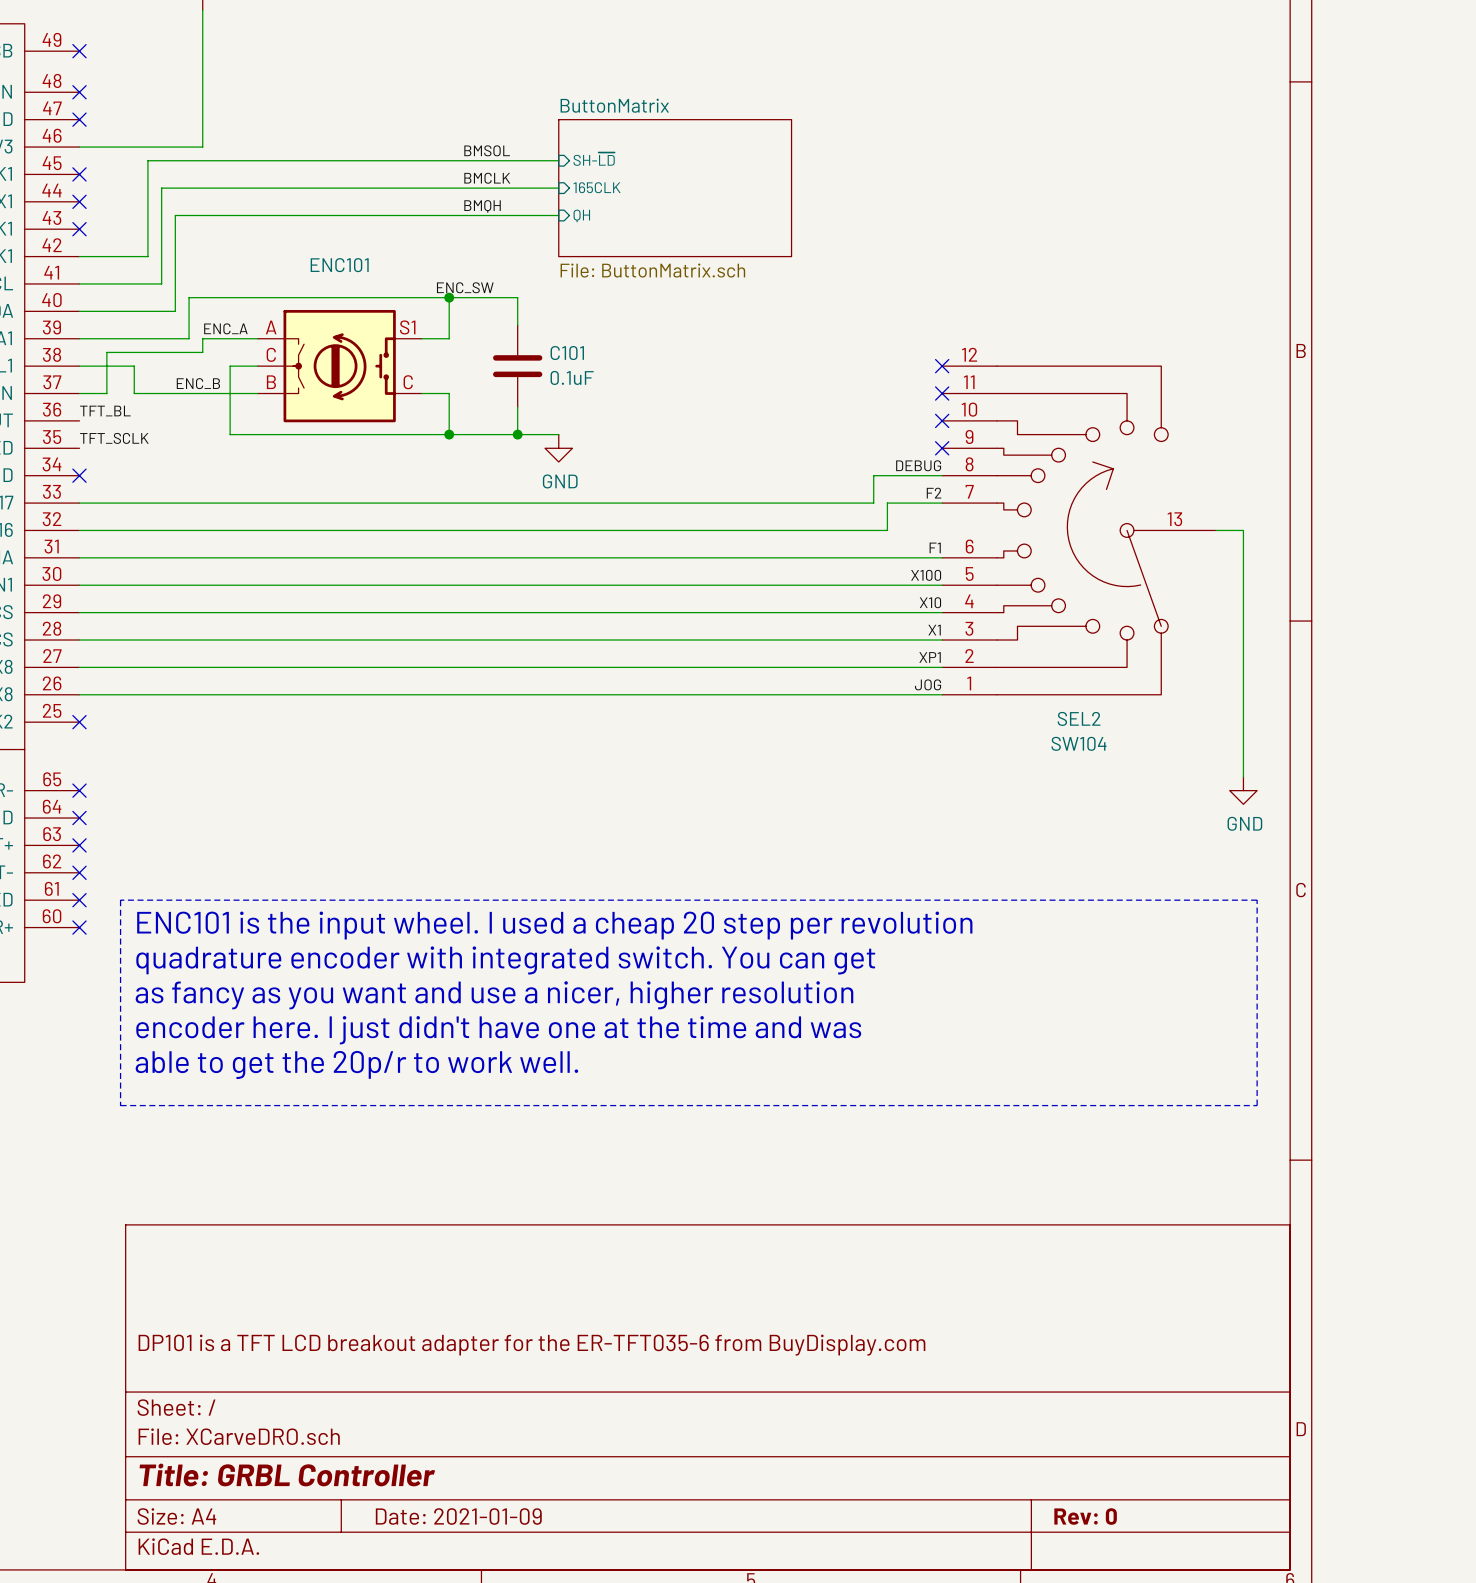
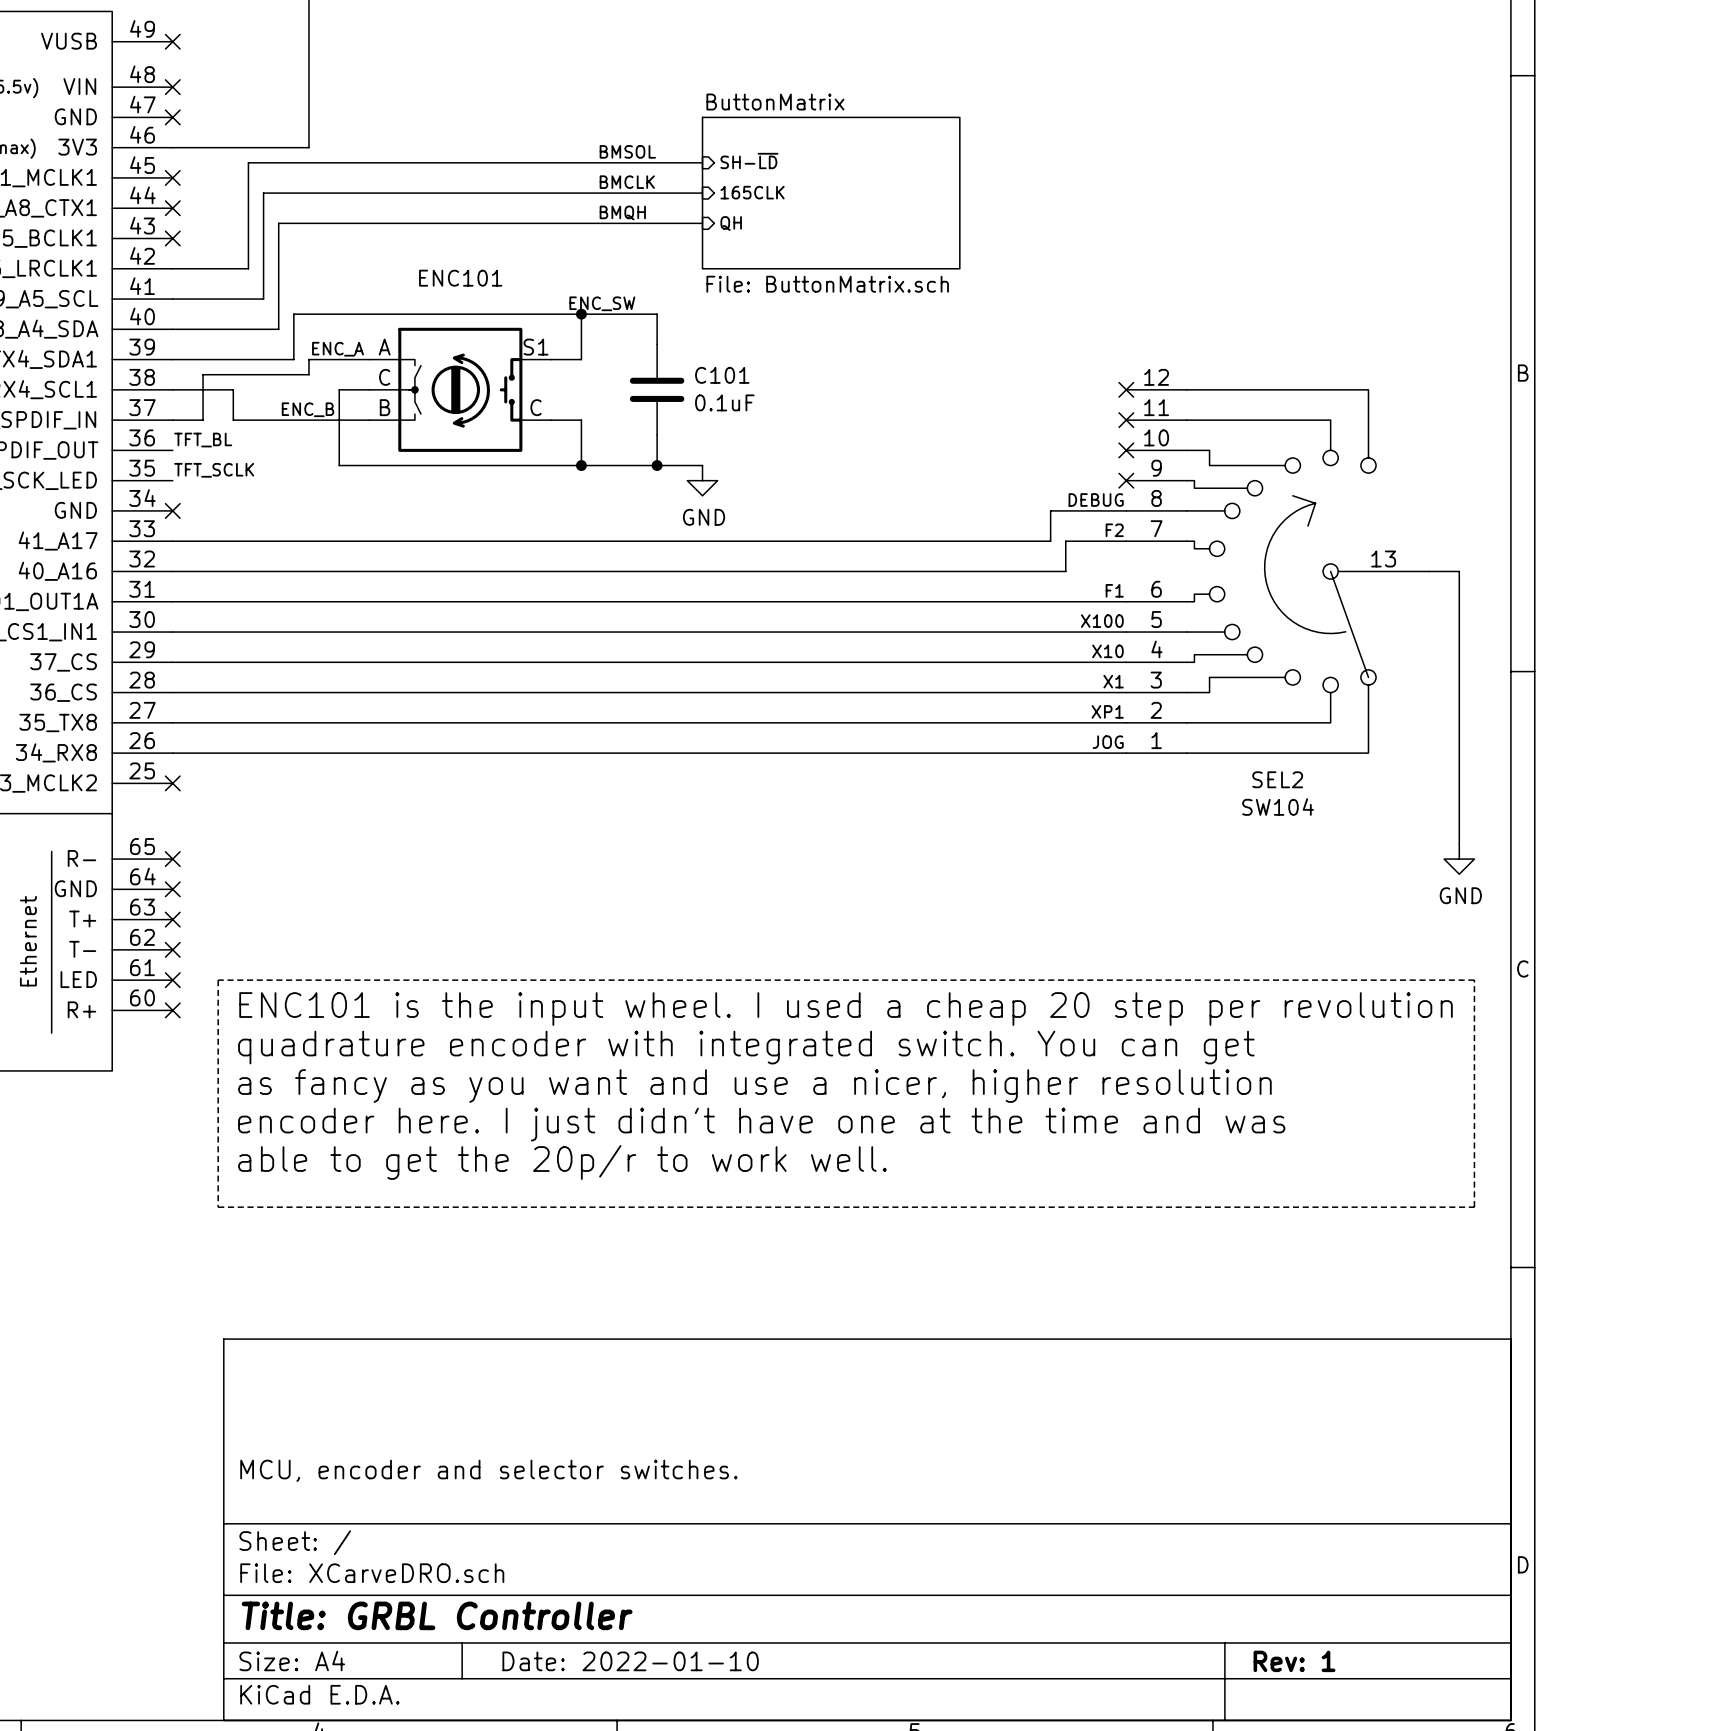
title block: DP101 is a TFT LCD breakout adapter for the ER-TFT035-6 from BuyDisplay.com (531, 1345) -> MCU, encoder and selector switches. (488, 1470)
title block: Date: 2021-01-09 (458, 1516) -> Date: 2022-01-10 (630, 1661)
title block: Rev: 0 (1085, 1516) -> Rev: 1 (1294, 1661)

